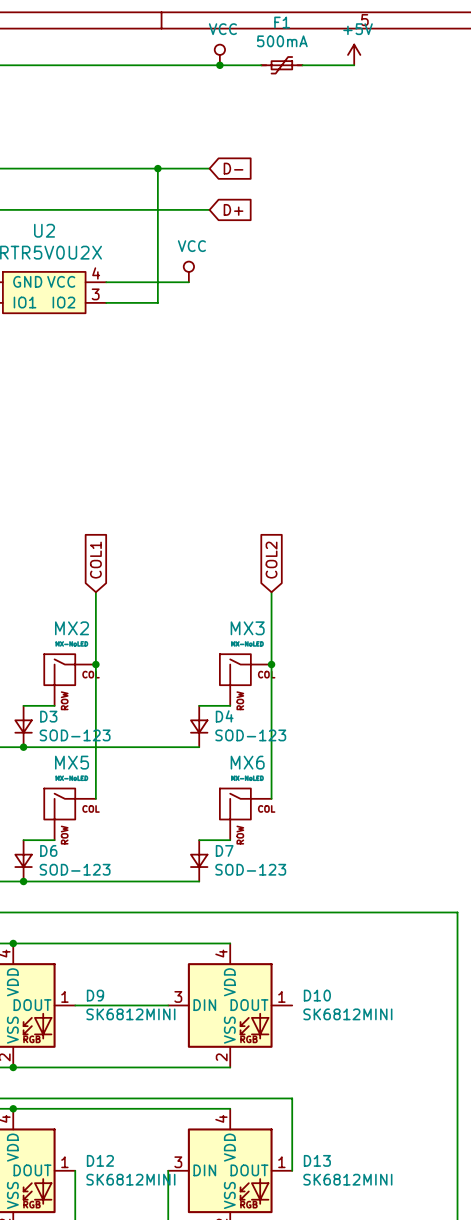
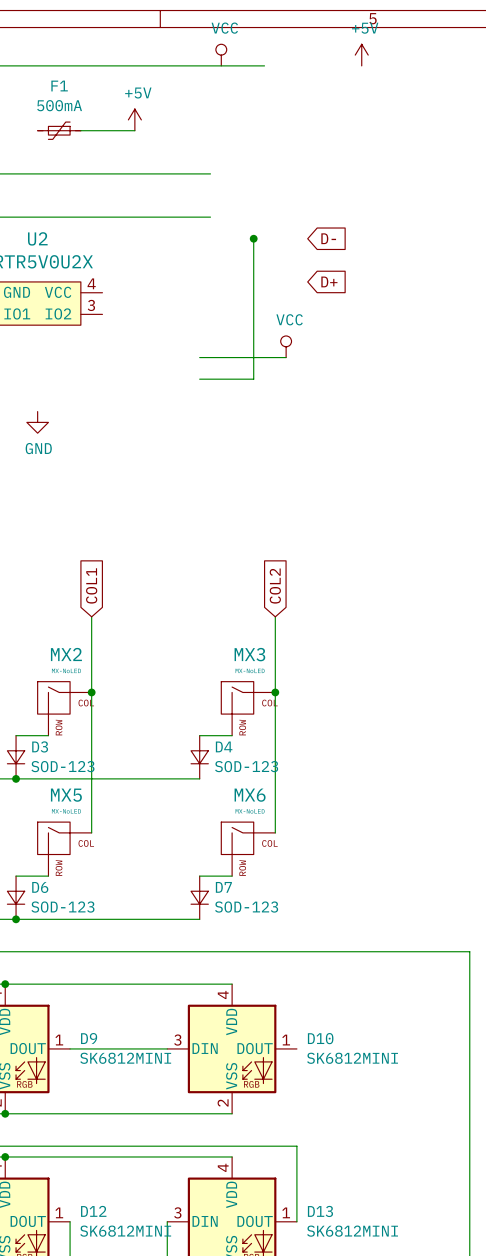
junction: (219, 65) -> none
F1 position: (281, 65) -> (59, 130)
wire: (302, 65) (354, 65) -> none
power symbol: none -> +5V (134, 119)
wire: none -> (80, 130) (134, 130)
wire: (157, 168) (157, 302) (106, 302) -> (253, 238) (253, 379) (199, 379)
junction: (157, 168) -> none
global label position: D- (233, 168) -> D- (328, 238)
global label position: D+ (233, 209) -> D+ (329, 281)
junction: none -> (253, 238)
power symbol position: VCC (188, 271) -> VCC (286, 346)
wire: (106, 282) (188, 282) -> (199, 357) (286, 357)
power symbol: none -> GND (37, 422)

